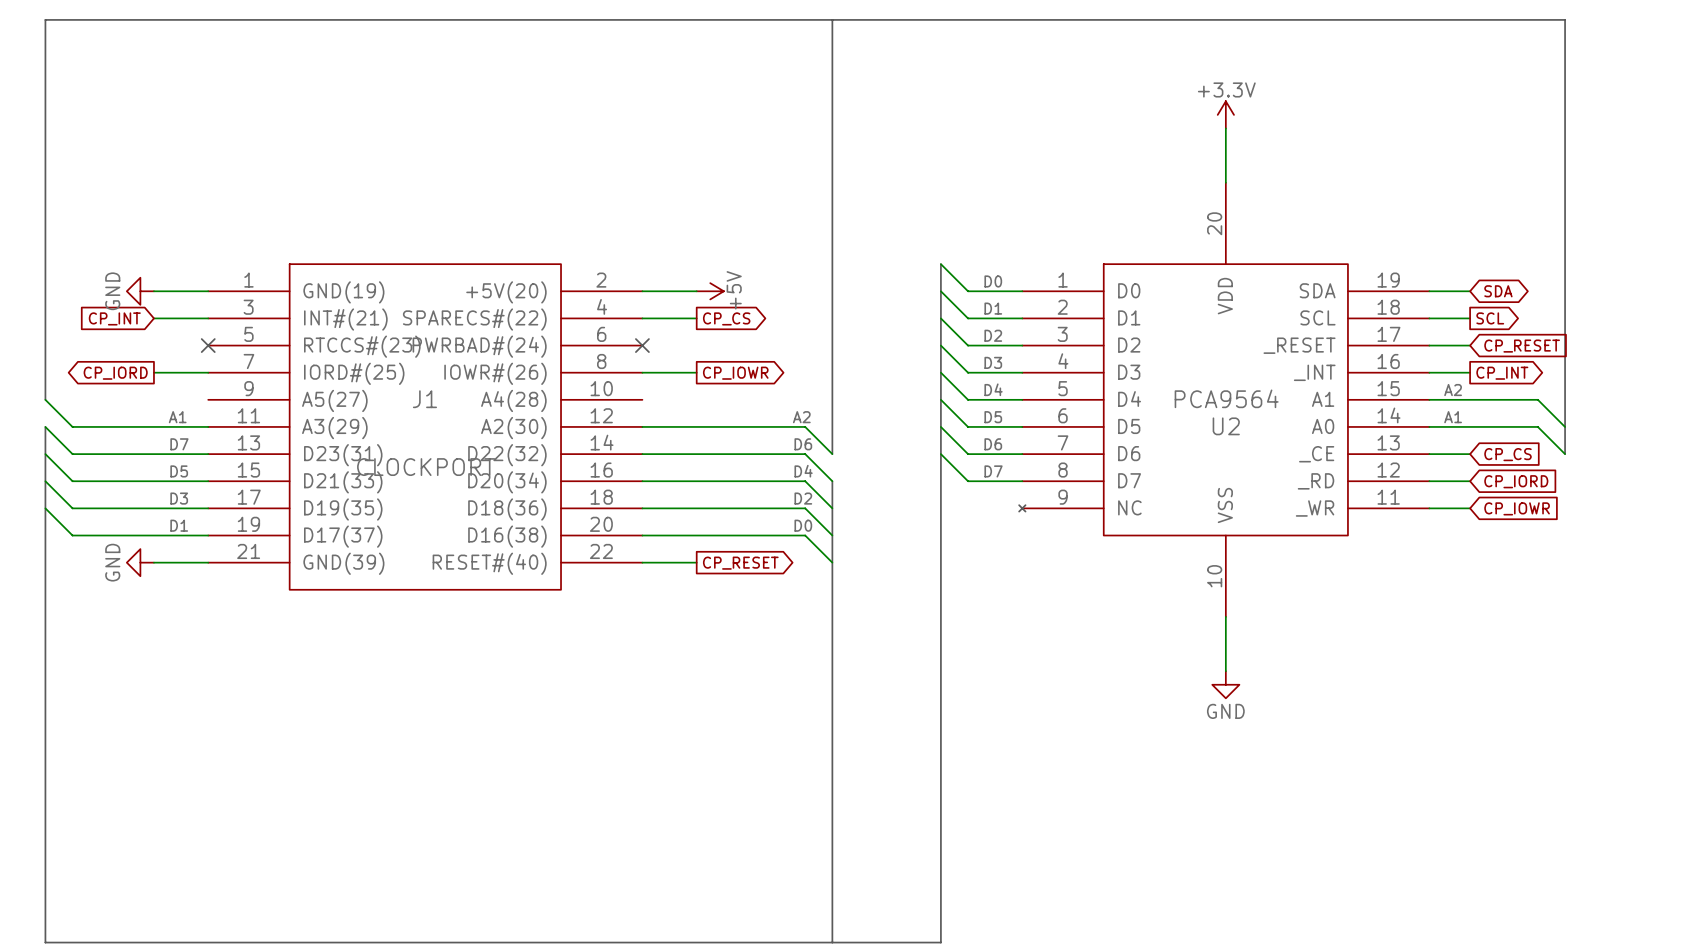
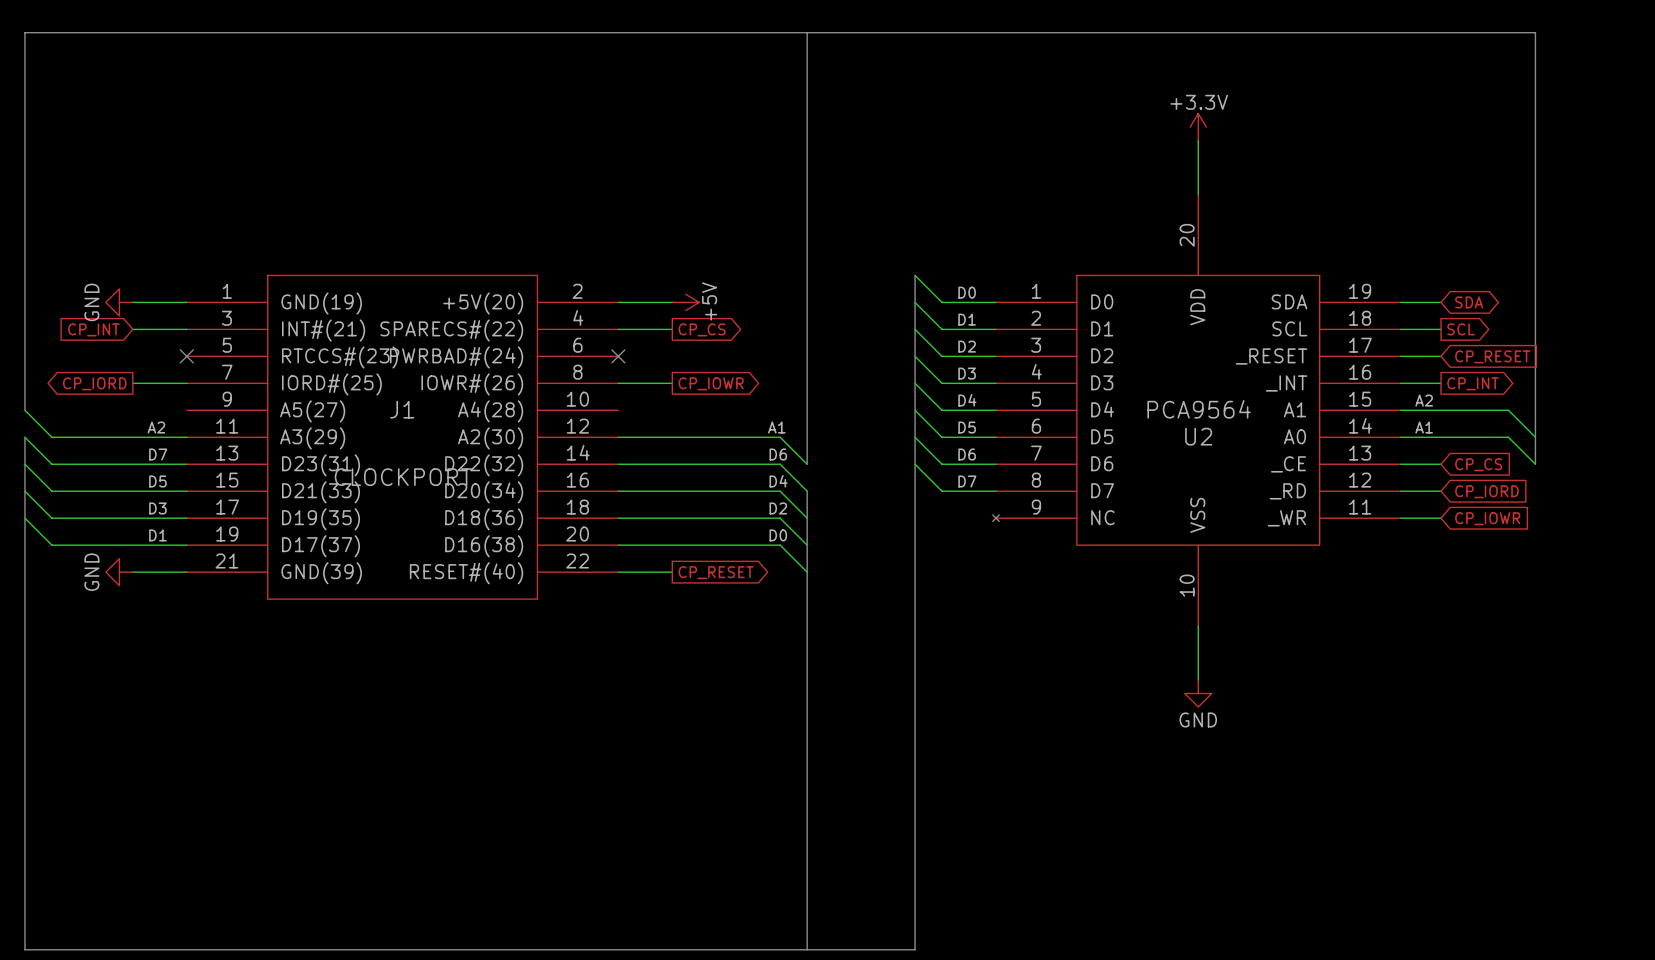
label: A1 (177, 417) -> A2 (156, 427)
label: A2 (801, 417) -> A1 (776, 427)

